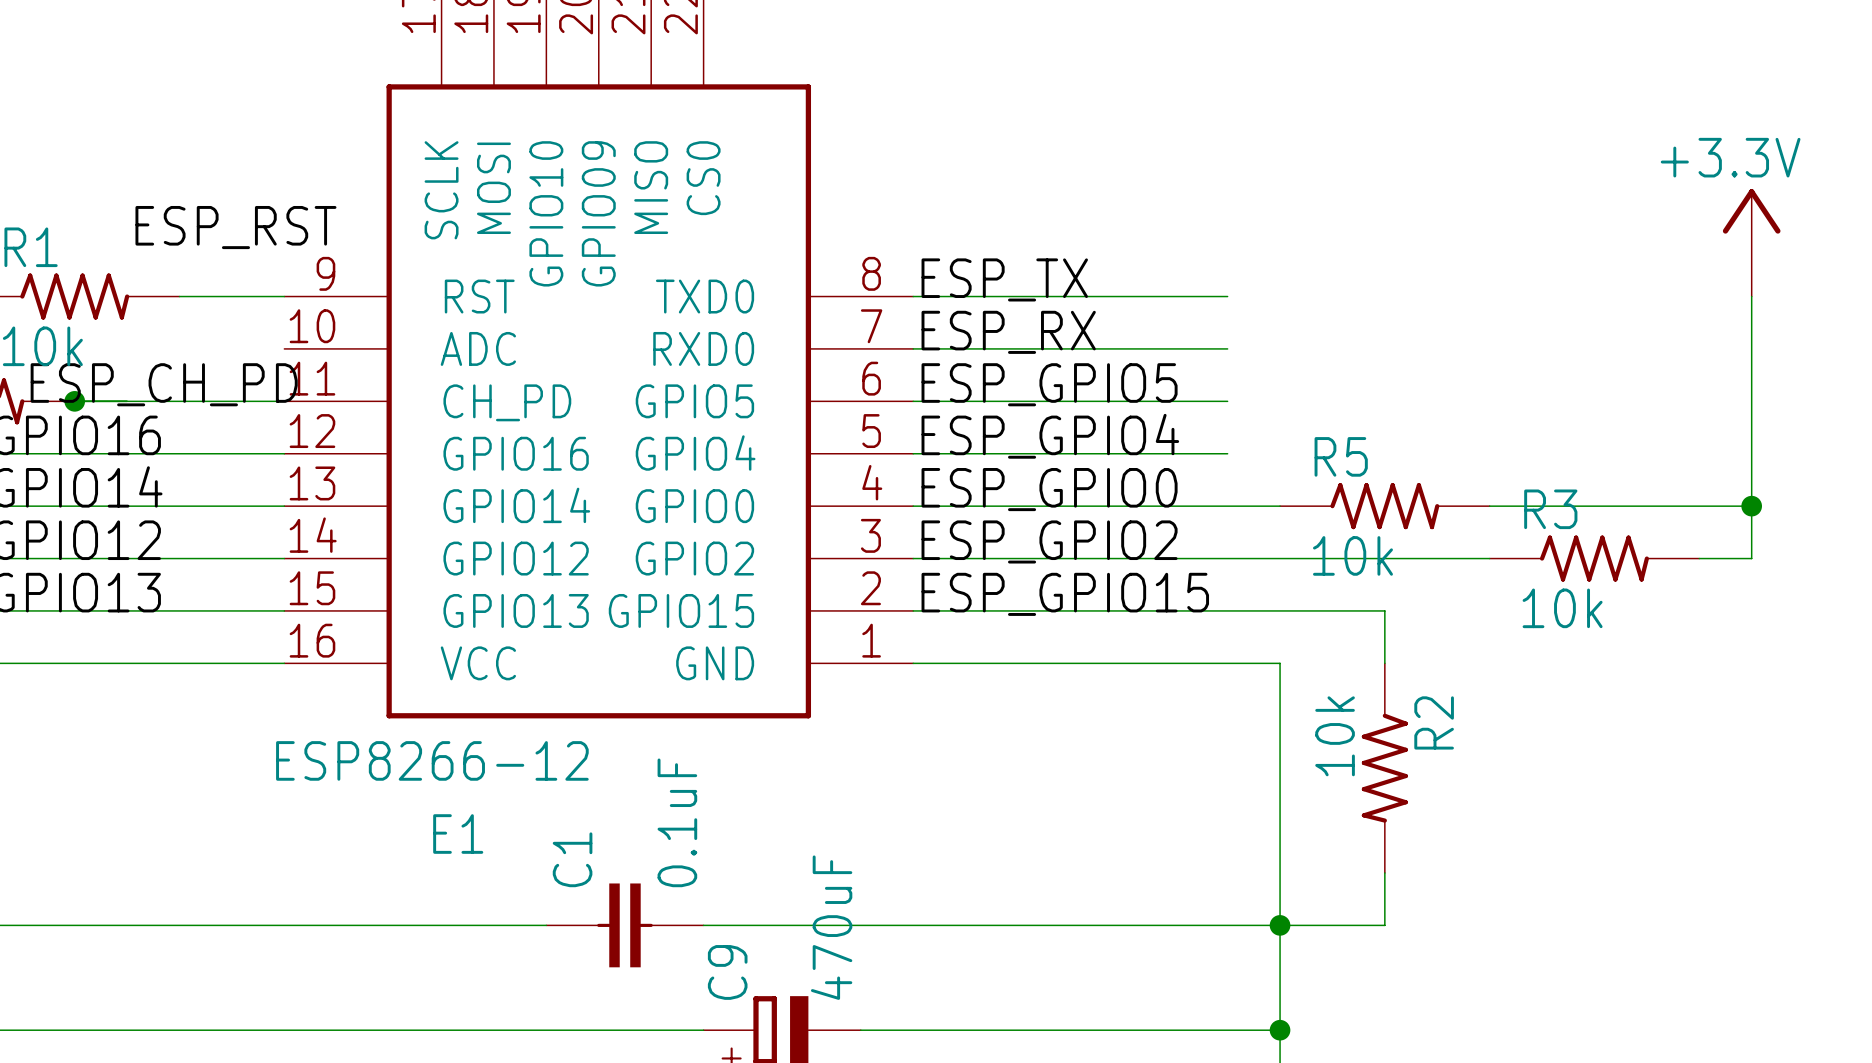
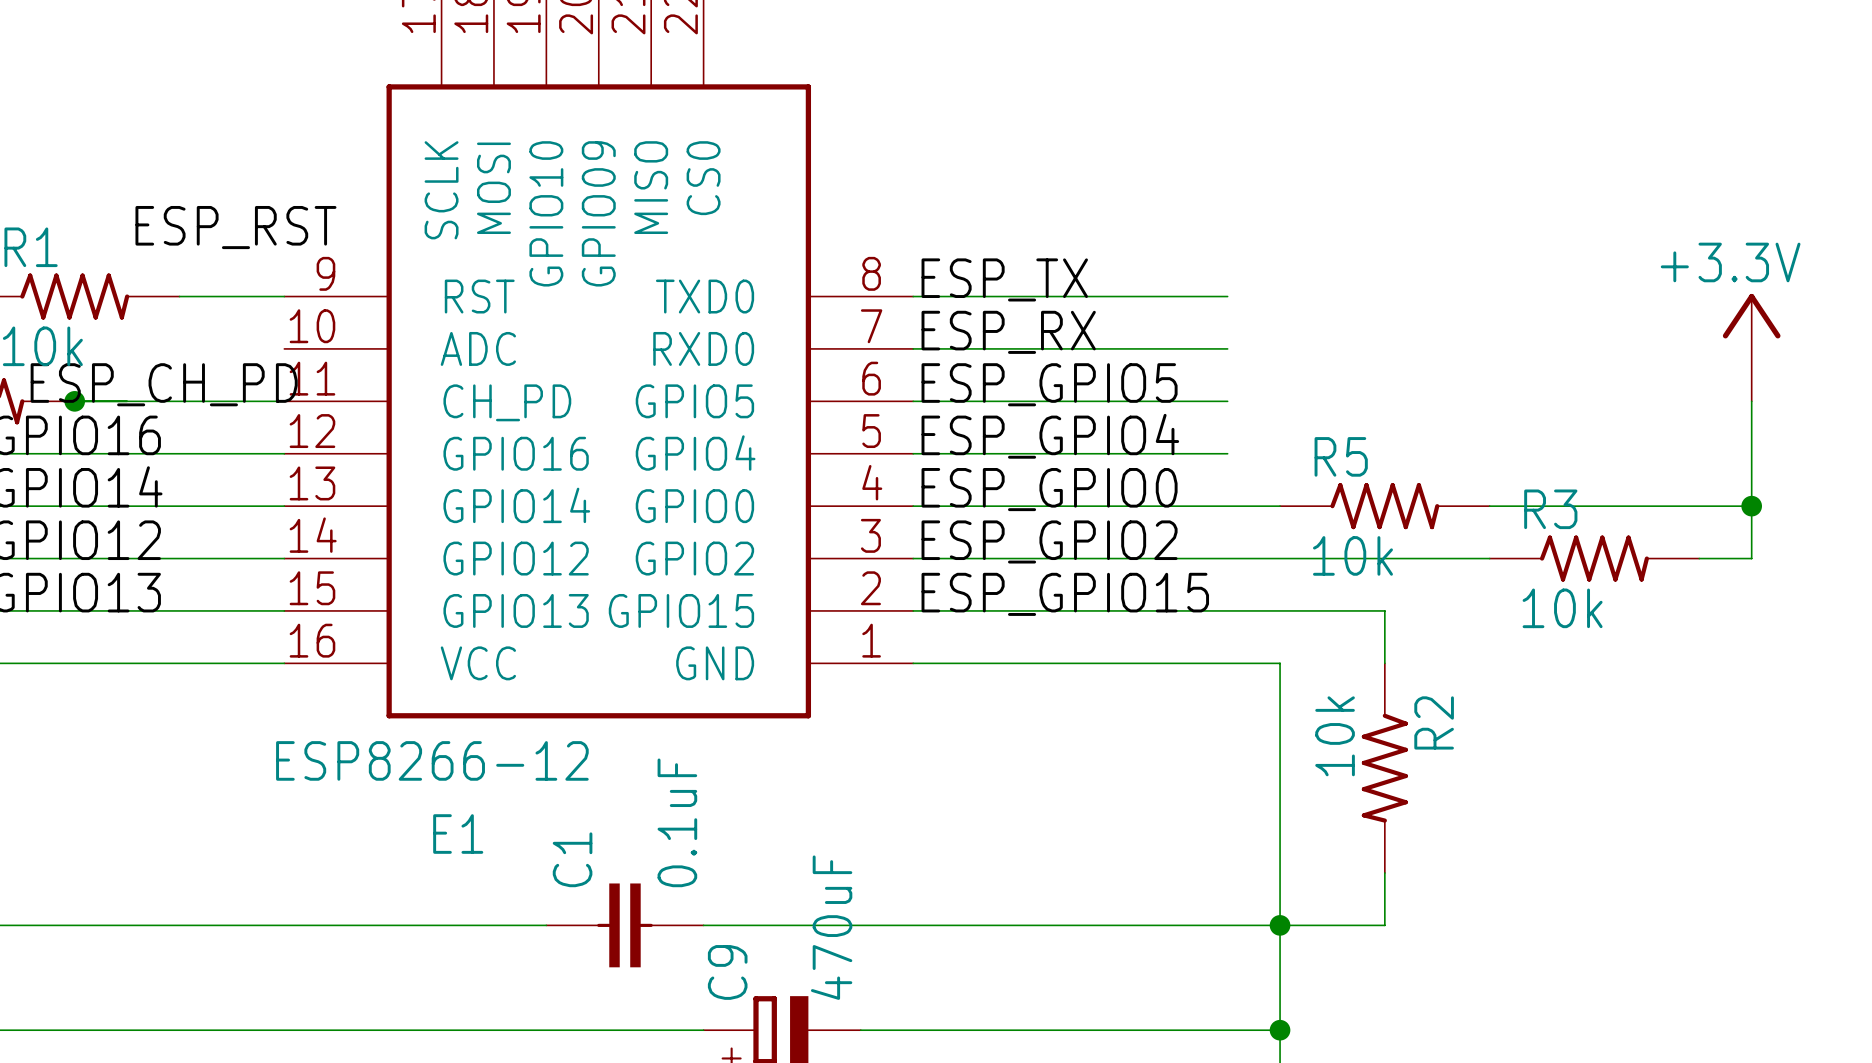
power symbol position: +3.3V (1751, 242) -> +3.3V (1751, 347)

